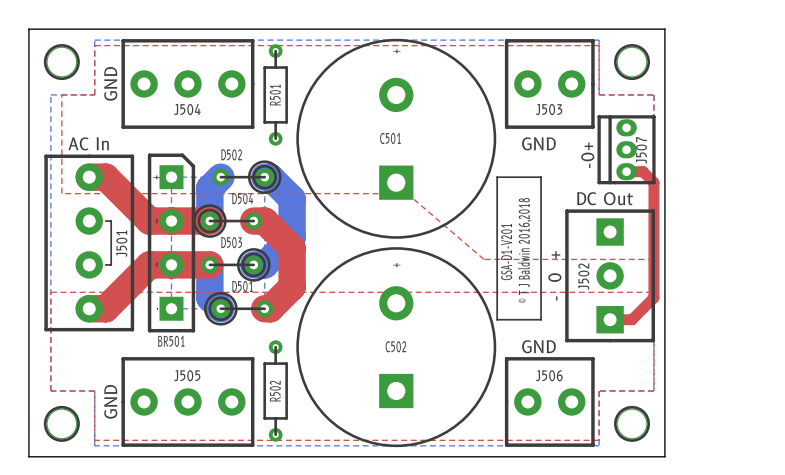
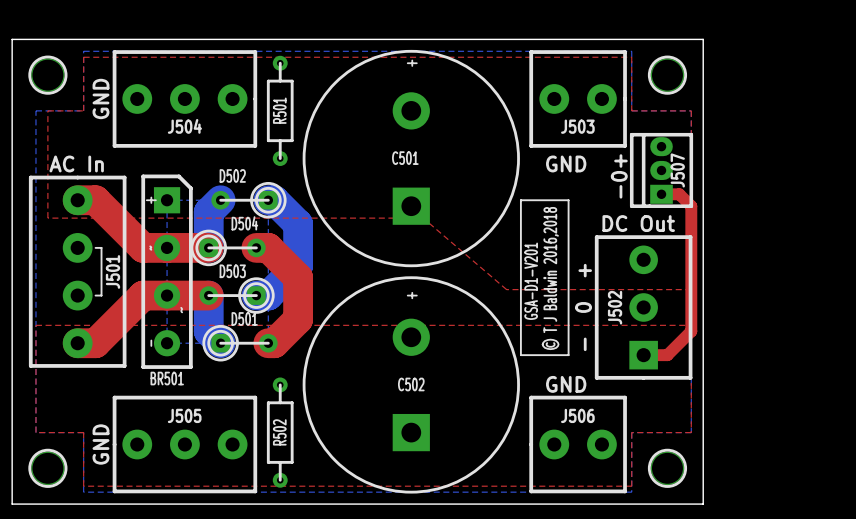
J507 footprint: [597, 115, 656, 185] -> [629, 132, 694, 208]
BR501 footprint: [147, 153, 196, 333] -> [141, 174, 193, 369]
J502 footprint: [565, 209, 655, 343] -> [594, 235, 693, 380]

